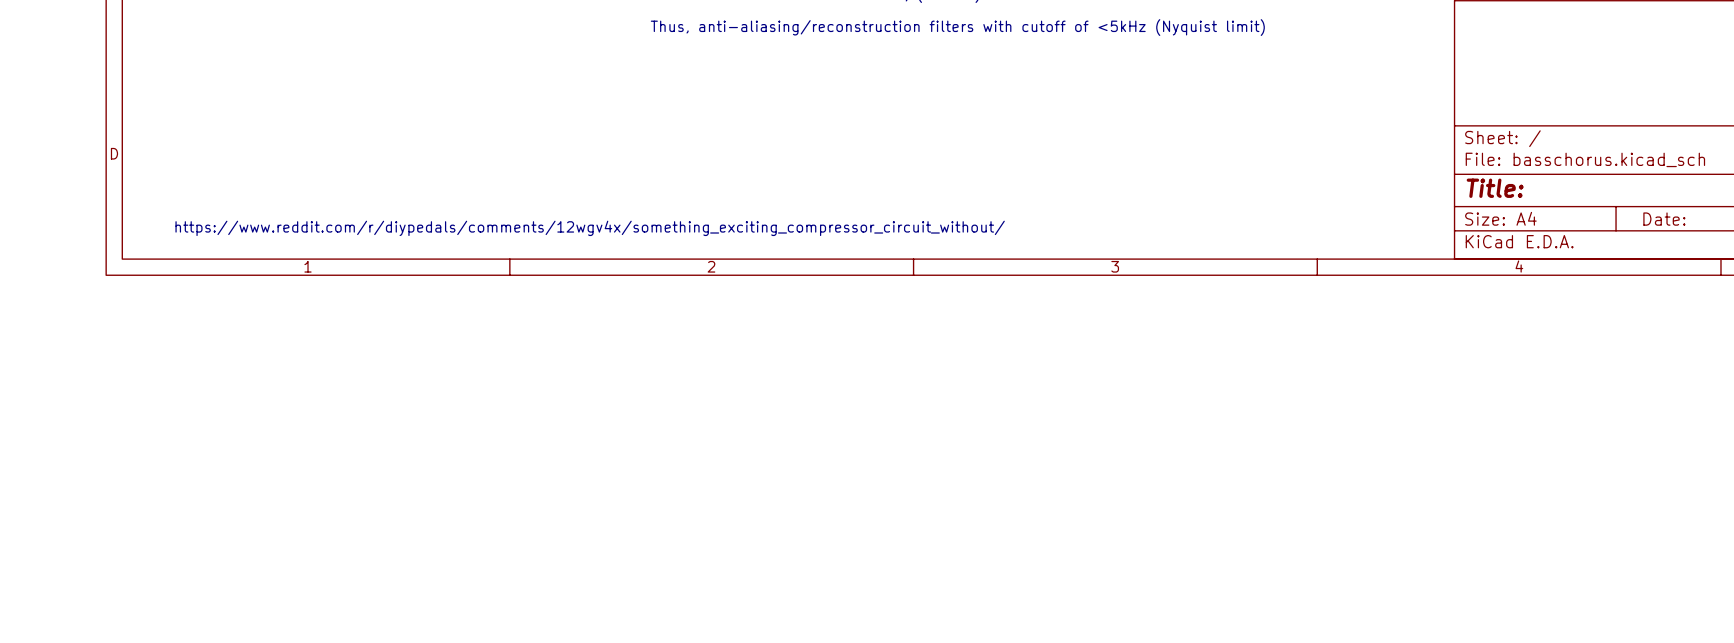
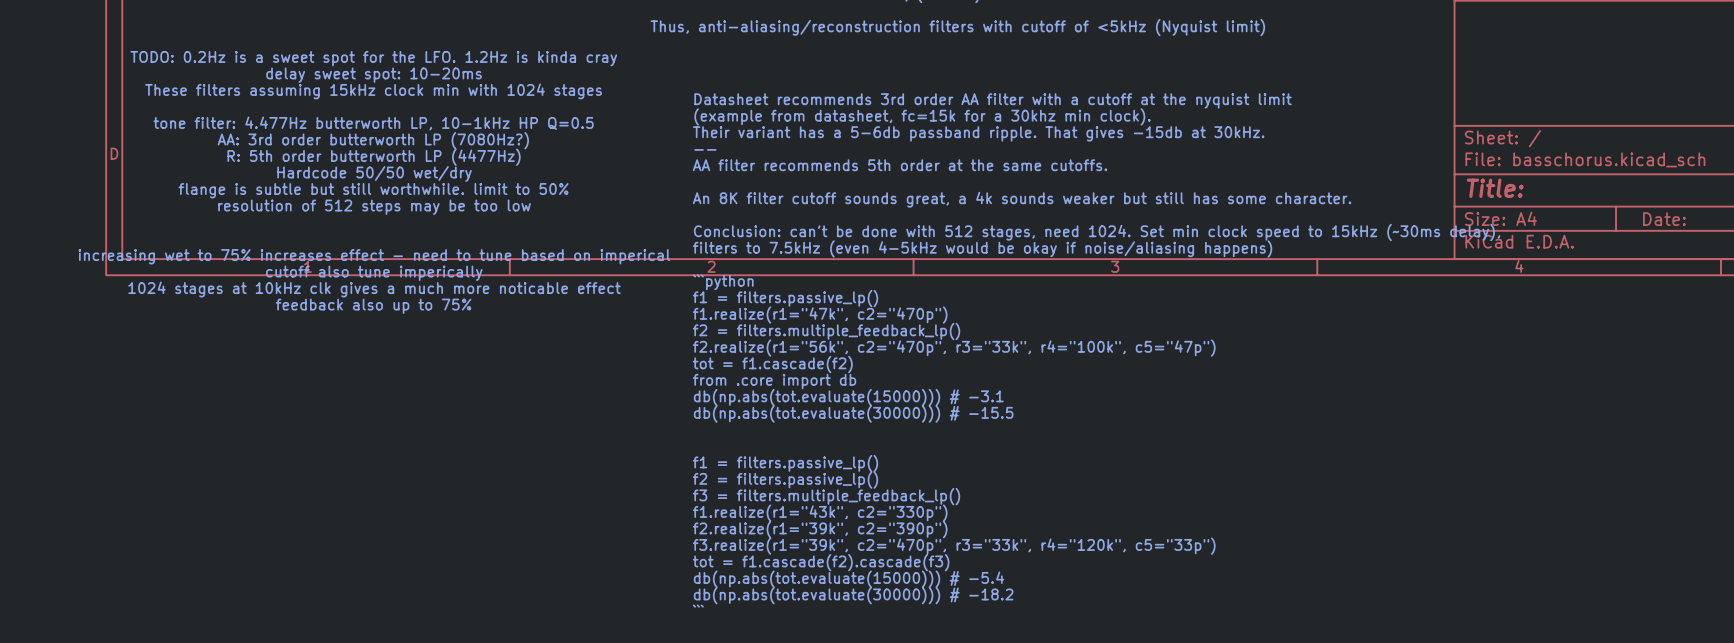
text: none -> TODO: 0.2Hz is a sweet spot for the LFO. 1.2Hz is kinda cray (373, 58)
text: none -> delay sweet spot: 10-20ms (374, 75)
text: none -> These filters assuming 15kHz clock min with 1024 stages (373, 91)
text: none -> Datasheet recommends 3rd order AA filter with a cutoff at the nyquist limit (993, 100)
text: none -> (example from datasheet, fc=15k for a 30khz min clock). (922, 116)
text: none -> tone filter: 4.477Hz butterworth LP, 10-1kHz HP Q=0.5 (373, 123)
text: none -> Their variant has a 5-6db passband ripple. That gives -15db at 30kHz. (978, 133)
text: none -> AA: 3rd order butterworth LP (7080Hz?) (373, 140)
text: none -> -- (705, 149)
text: none -> R: 5th order butterworth LP (4477Hz) (374, 157)
text: none -> AA filter recommends 5th order at the same cutoffs. (900, 165)
text: none -> Hardcode 50/50 wet/dry (374, 173)
text: none -> flange is subtle but still worthwhile. limit to 50% (373, 190)
text: none -> An 8K filter cutoff sounds great, a 4k sounds weaker but still has some character. (1022, 199)
text: none -> resolution of 512 steps may be too low (374, 207)
text: https://www.reddit.com/r/diypedals/comments/12wgv4x/something_exciting_compressor_circuit_without/ (590, 228) -> none
text: none -> Conclusion: can't be done with 512 stages, need 1024. Set min clock speed to 15kHz (~30ms delay), (1097, 232)
text: none -> filters to 7.5kHz (even 4-5kHz would be okay if noise/aliasing happens) (982, 248)
text: none -> increasing wet to 75% increases effect - need to tune based on imperical (374, 256)
text: none -> cutoff also tune imperically (374, 273)
text: none -> ```python (723, 282)
text: none -> 1024 stages at 10kHz clk gives a much more noticable effect (374, 289)
text: none -> f1 = filters.passive_lp() (785, 298)
text: none -> feedback also up to 75% (373, 306)
text: none -> f1.realize(r1="47k", c2="470p") (820, 315)
text: none -> f2 = filters.multiple_feedback_lp() (826, 331)
text: none -> f2.realize(r1="56k", c2="470p", r3="33k", r4="100k", c5="47p") (954, 348)
text: none -> tot = f1.cascade(f2) (772, 364)
text: none -> from .core import db (774, 381)
text: none -> db(np.abs(tot.evaluate(15000))) # -3.1 (848, 397)
text: none -> db(np.abs(tot.evaluate(30000))) # -15.5 (853, 414)
text: none -> f1 = filters.passive_lp() (785, 463)
text: none -> f2 = filters.passive_lp() (785, 480)
text: none -> f3 = filters.multiple_feedback_lp() (826, 496)
text: none -> f1.realize(r1="43k", c2="330p") (820, 513)
text: none -> f2.realize(r1="39k", c2="390p") (820, 529)
text: none -> f3.realize(r1="39k", c2="470p", r3="33k", r4="120k", c5="33p") (954, 546)
text: none -> tot = f1.cascade(f2).cascade(f3) (821, 562)
text: none -> db(np.abs(tot.evaluate(15000))) # -5.4 (849, 579)
text: none -> db(np.abs(tot.evaluate(30000))) # -18.2 (853, 595)
text: none -> ``` (698, 606)

